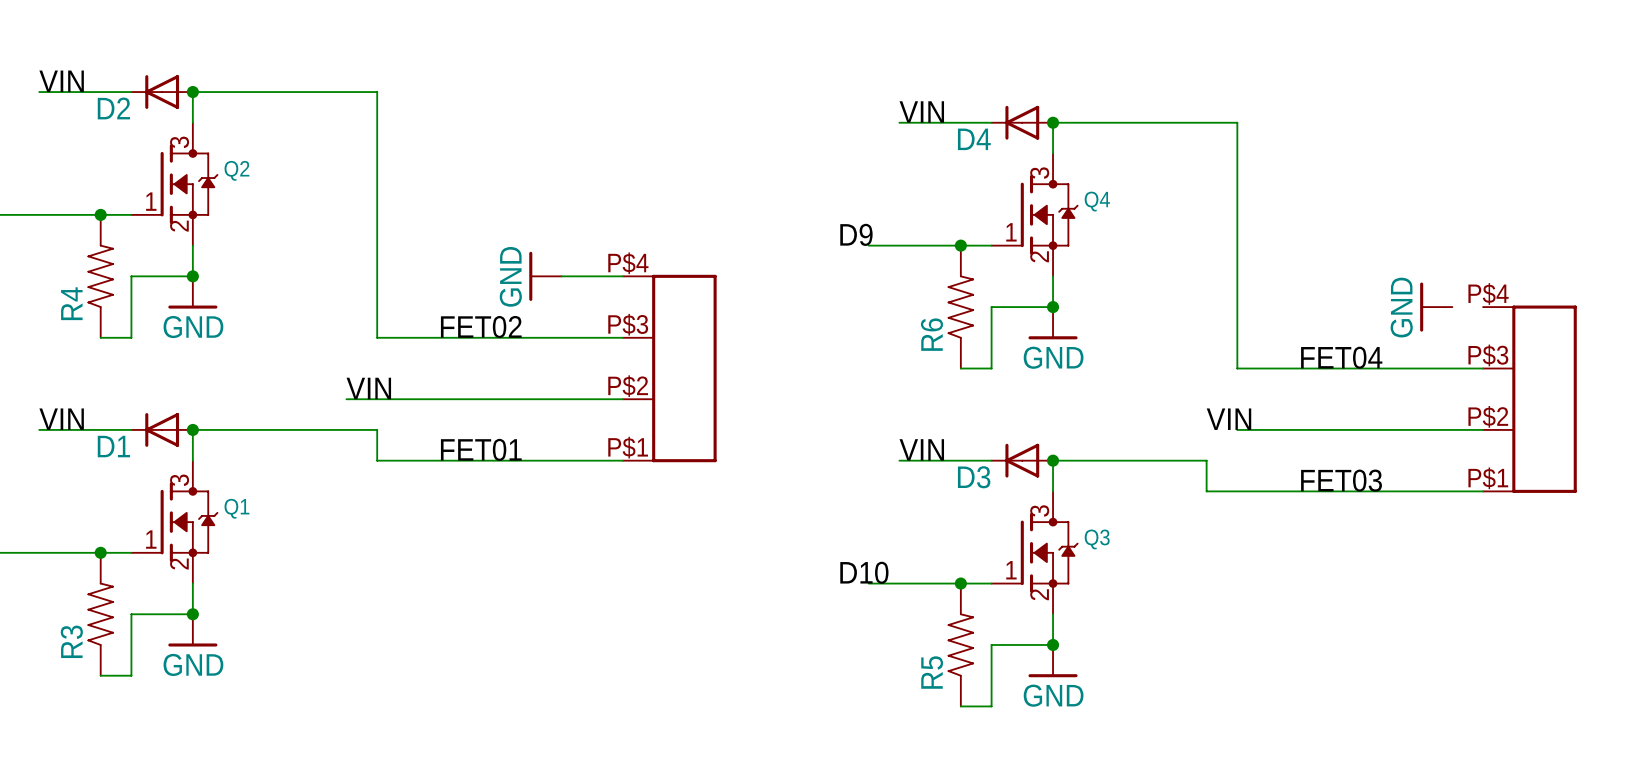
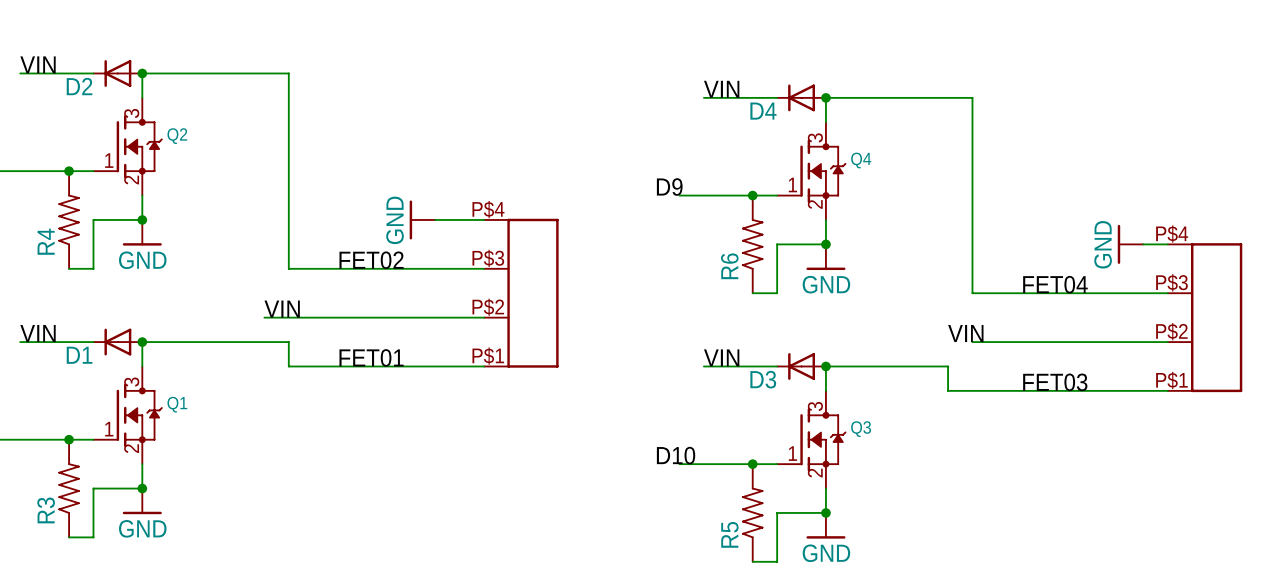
wire: none -> (1143, 244) (1167, 244)

